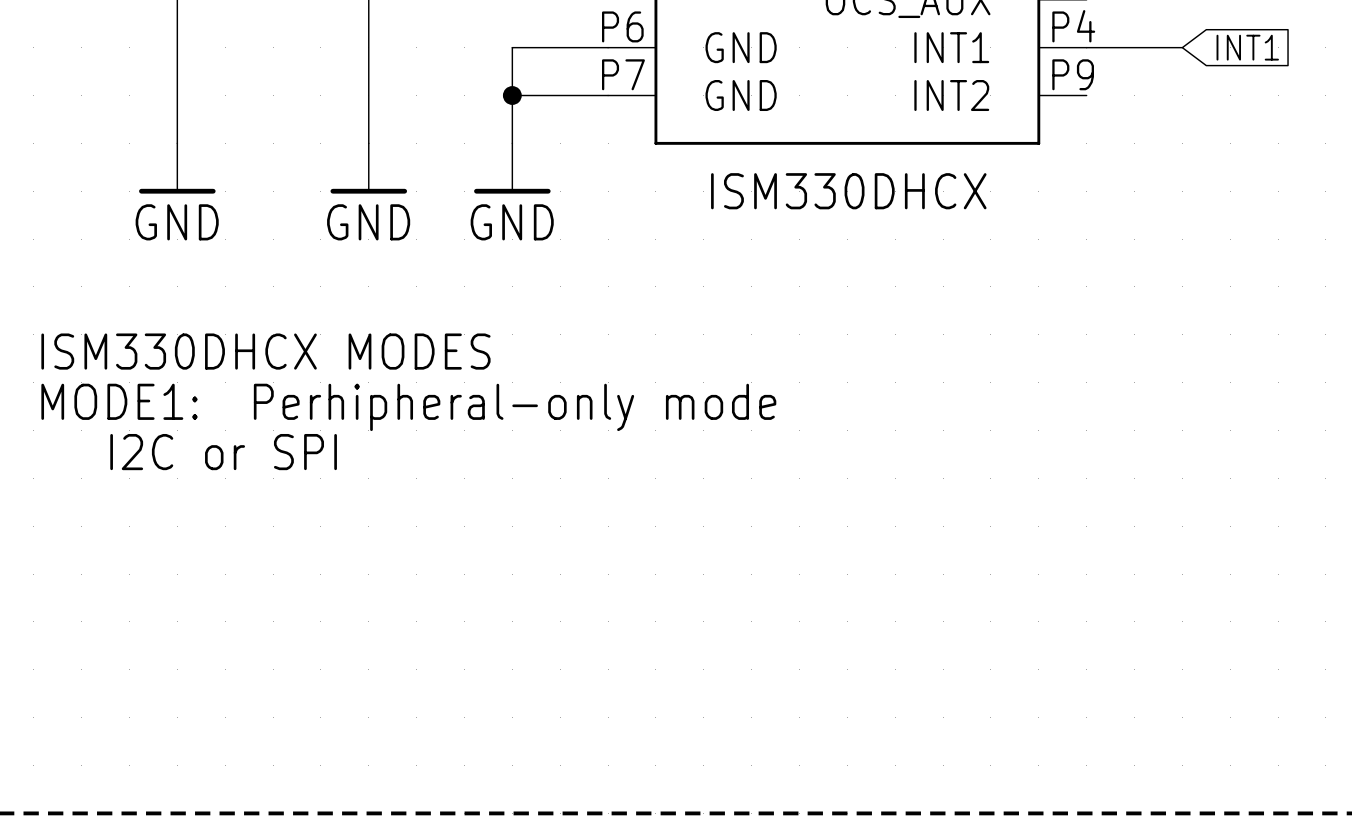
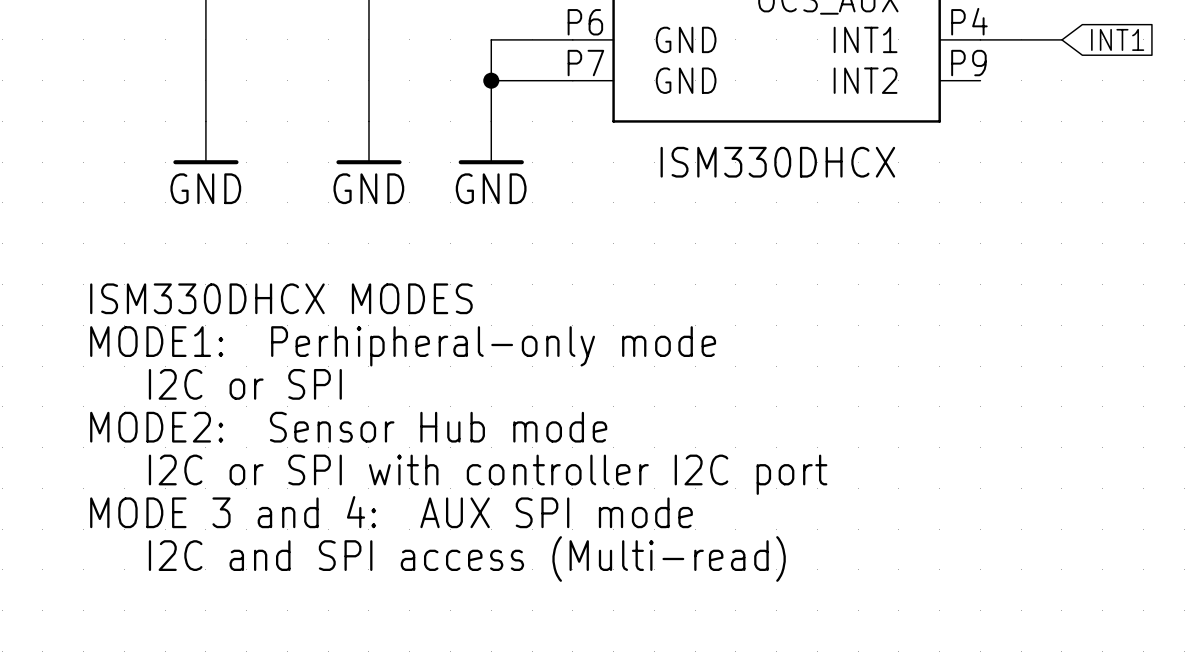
text: none -> MODE2: Sensor Hub mode (348, 427)
text: none -> I2C or SPI with controller I2C port (488, 474)
text: none -> MODE 3 and 4: AUX SPI mode (391, 512)
text: none -> I2C and SPI access (Multi-read) (467, 558)

